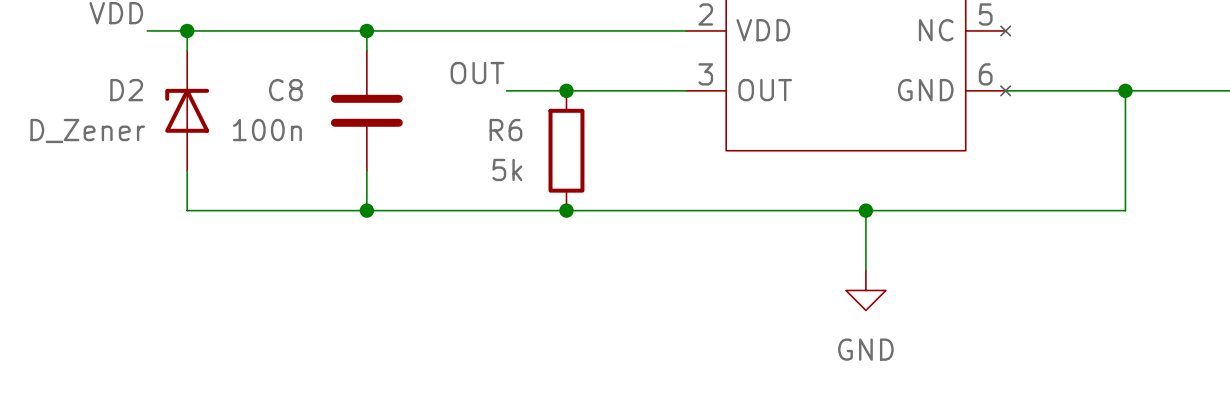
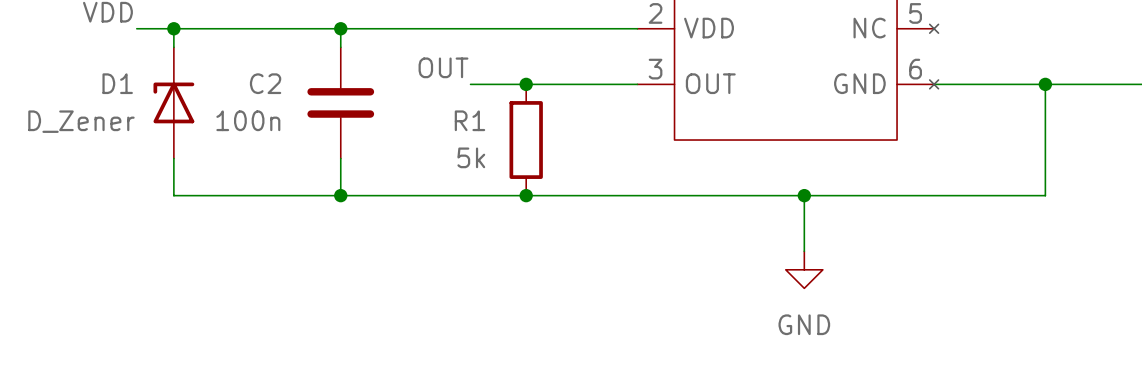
D2 name: D2 (126, 90) -> D1 (117, 83)
C8 name: C8 (285, 90) -> C2 (265, 83)
R6 name: R6 (505, 130) -> R1 (469, 120)

